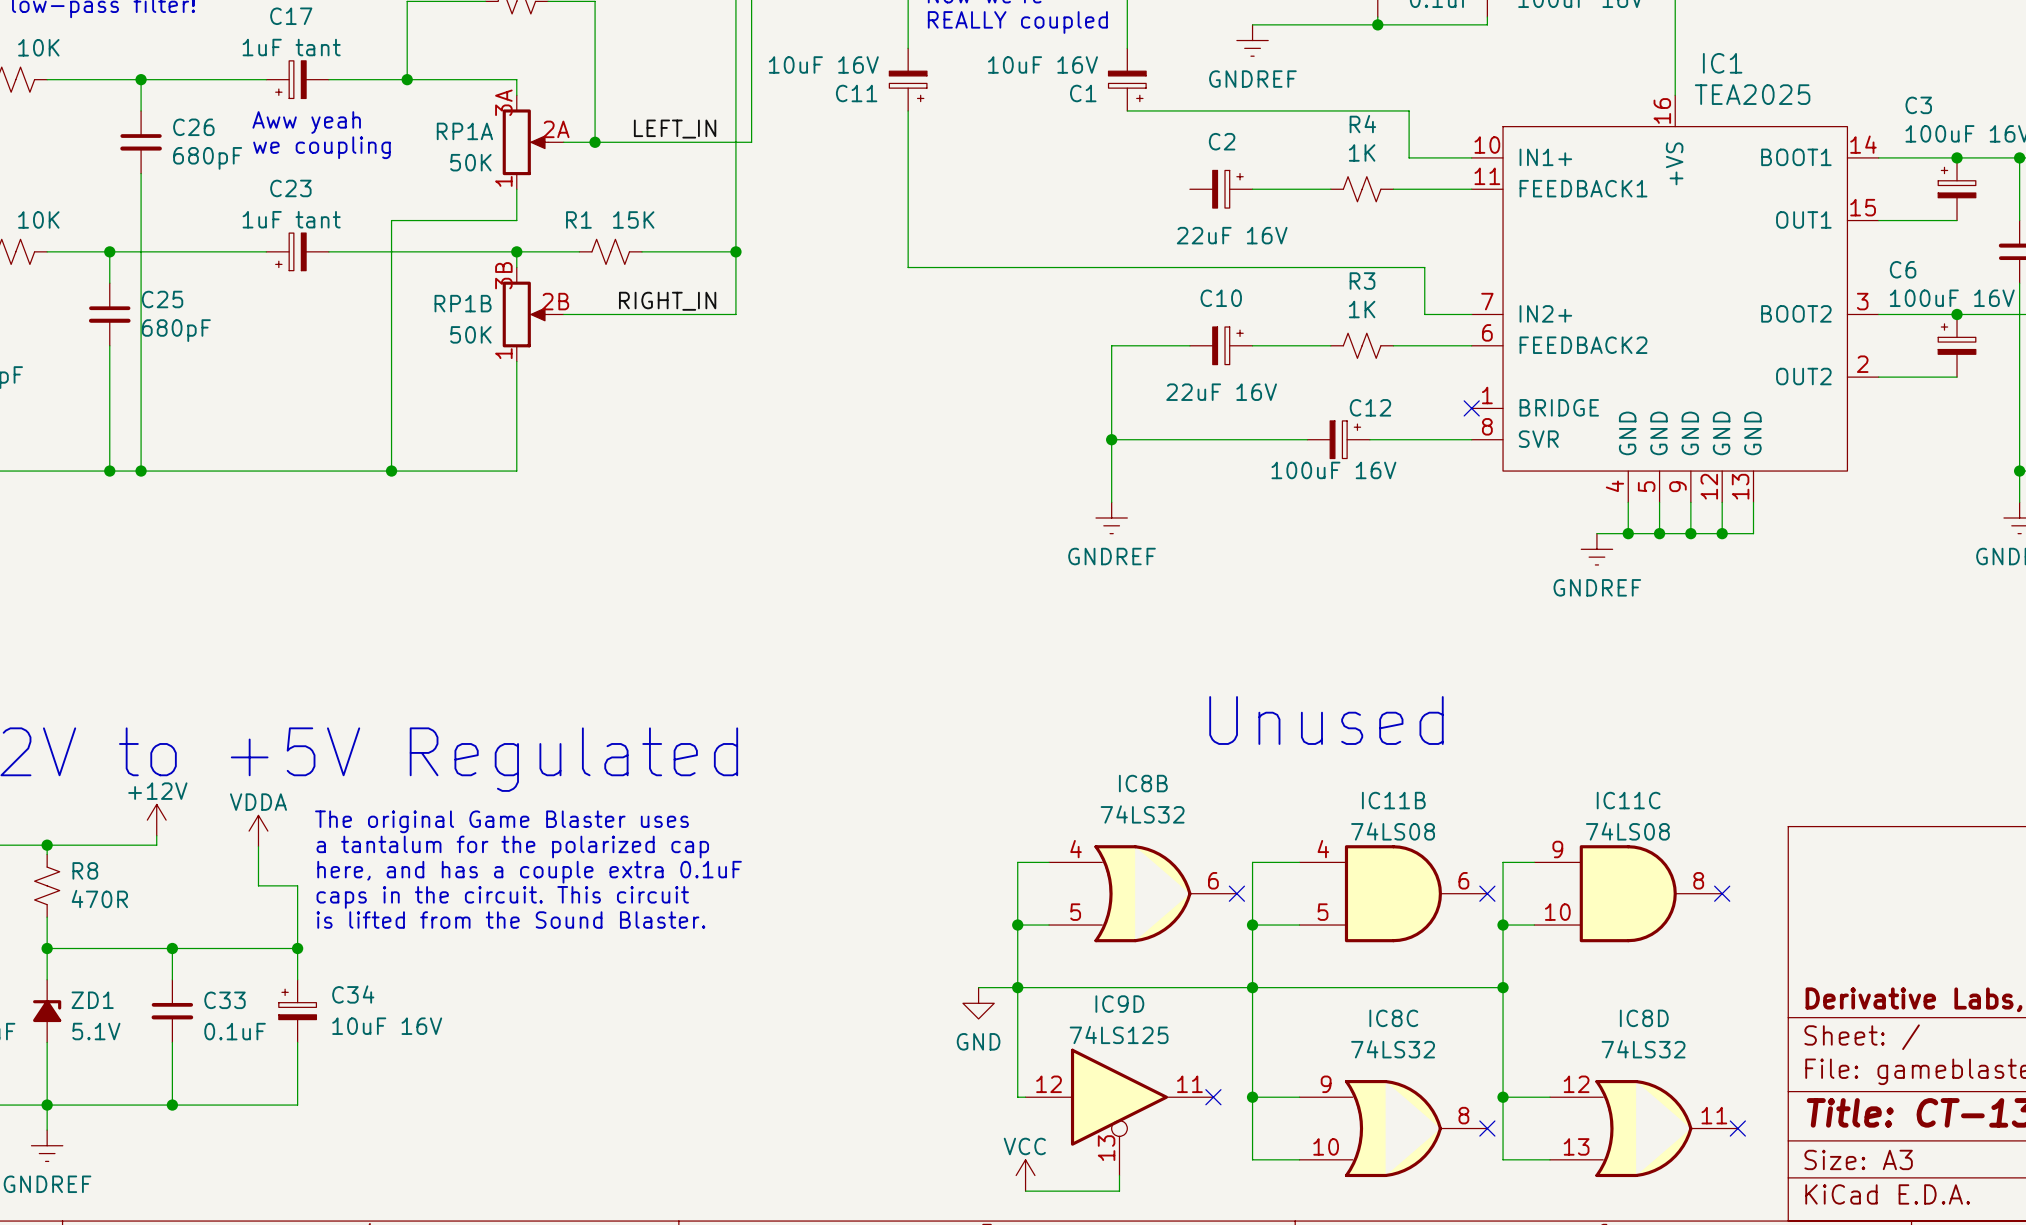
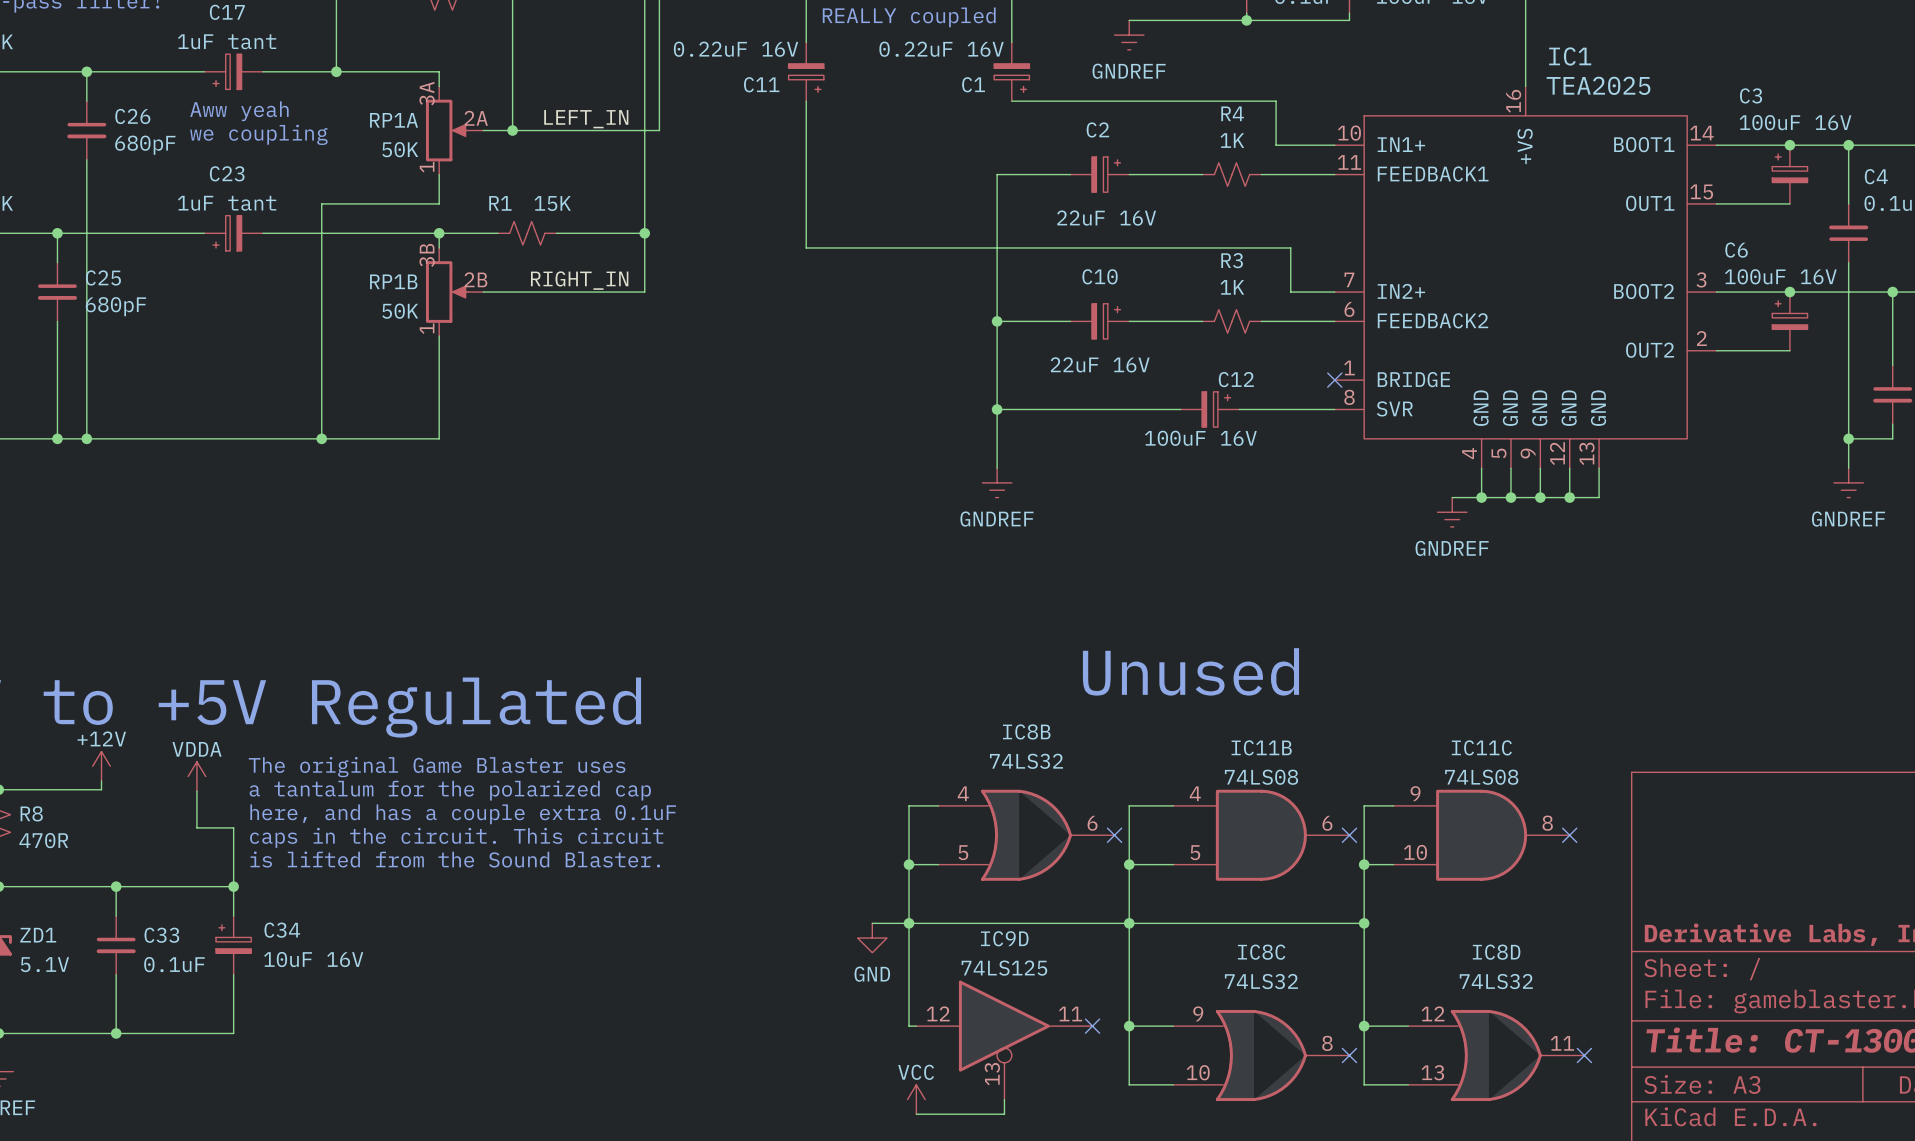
C11 value: 10uF 16V (823, 64) -> 0.22uF 16V (736, 49)
C1 value: 10uF 16V (1042, 64) -> 0.22uF 16V (941, 49)
wire: none -> (1070, 174) (997, 174) (997, 321)
junction: none -> (997, 321)

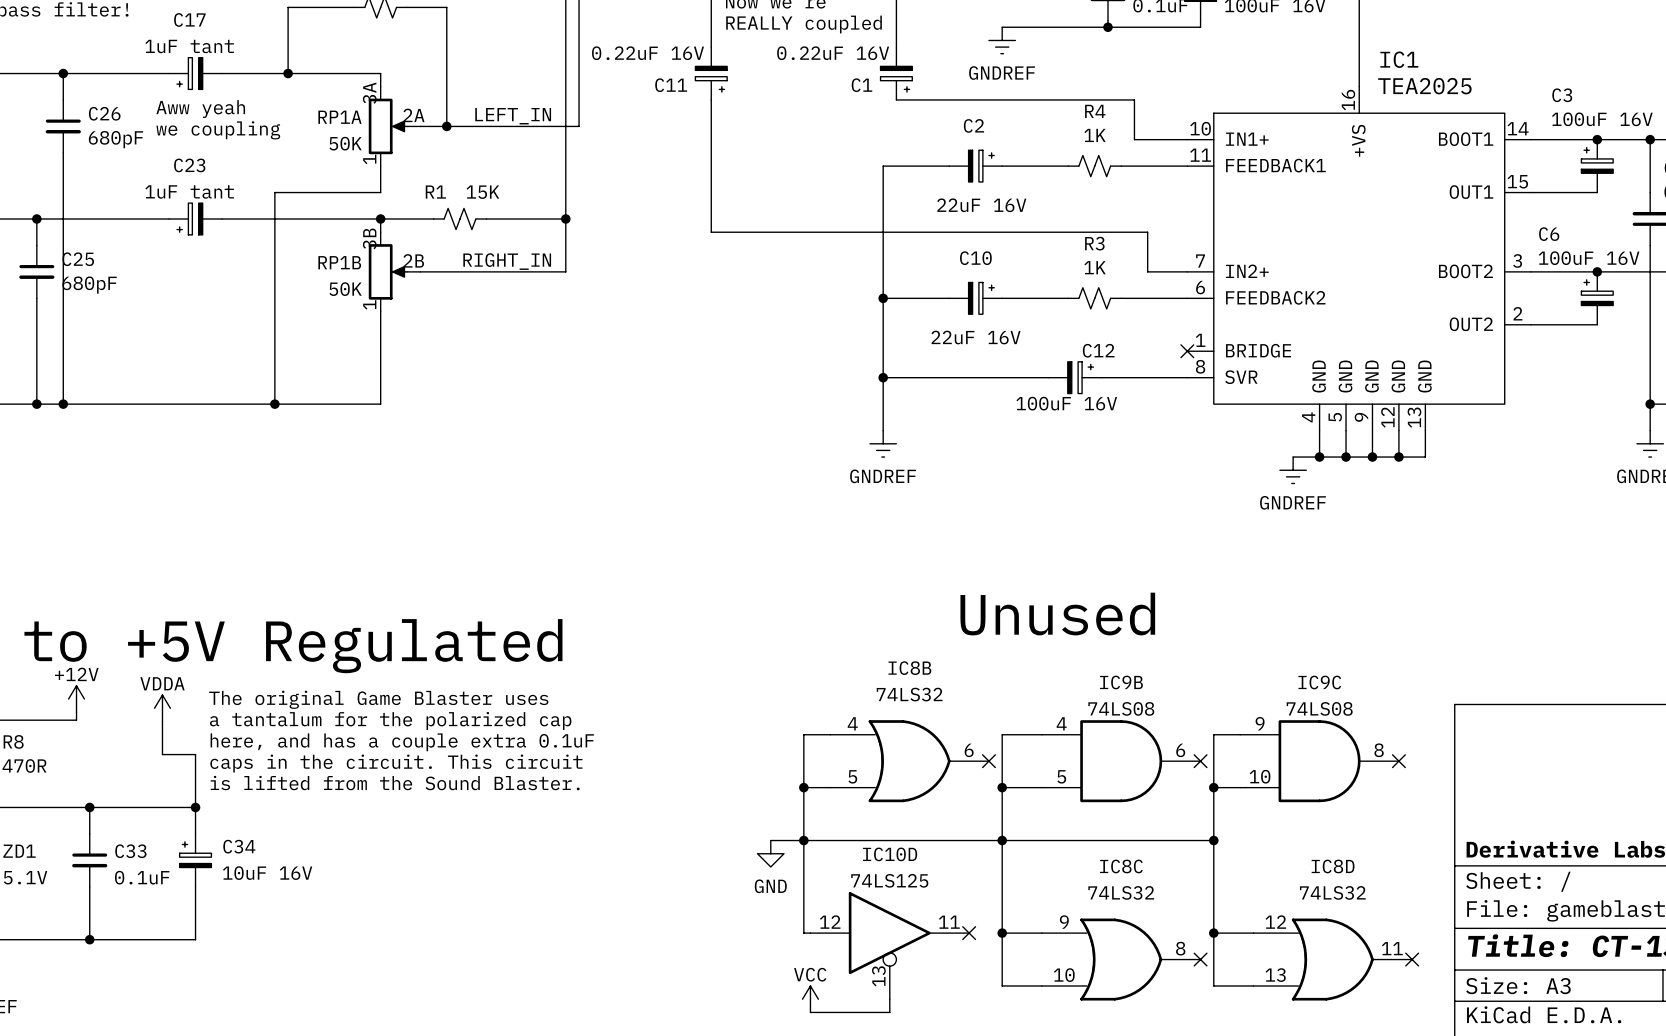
IC11B name: IC11B (1261, 747) -> IC9B (1121, 682)
IC11C name: IC11C (1481, 747) -> IC9C (1319, 682)
IC9D name: IC9D (1004, 938) -> IC10D (890, 854)

